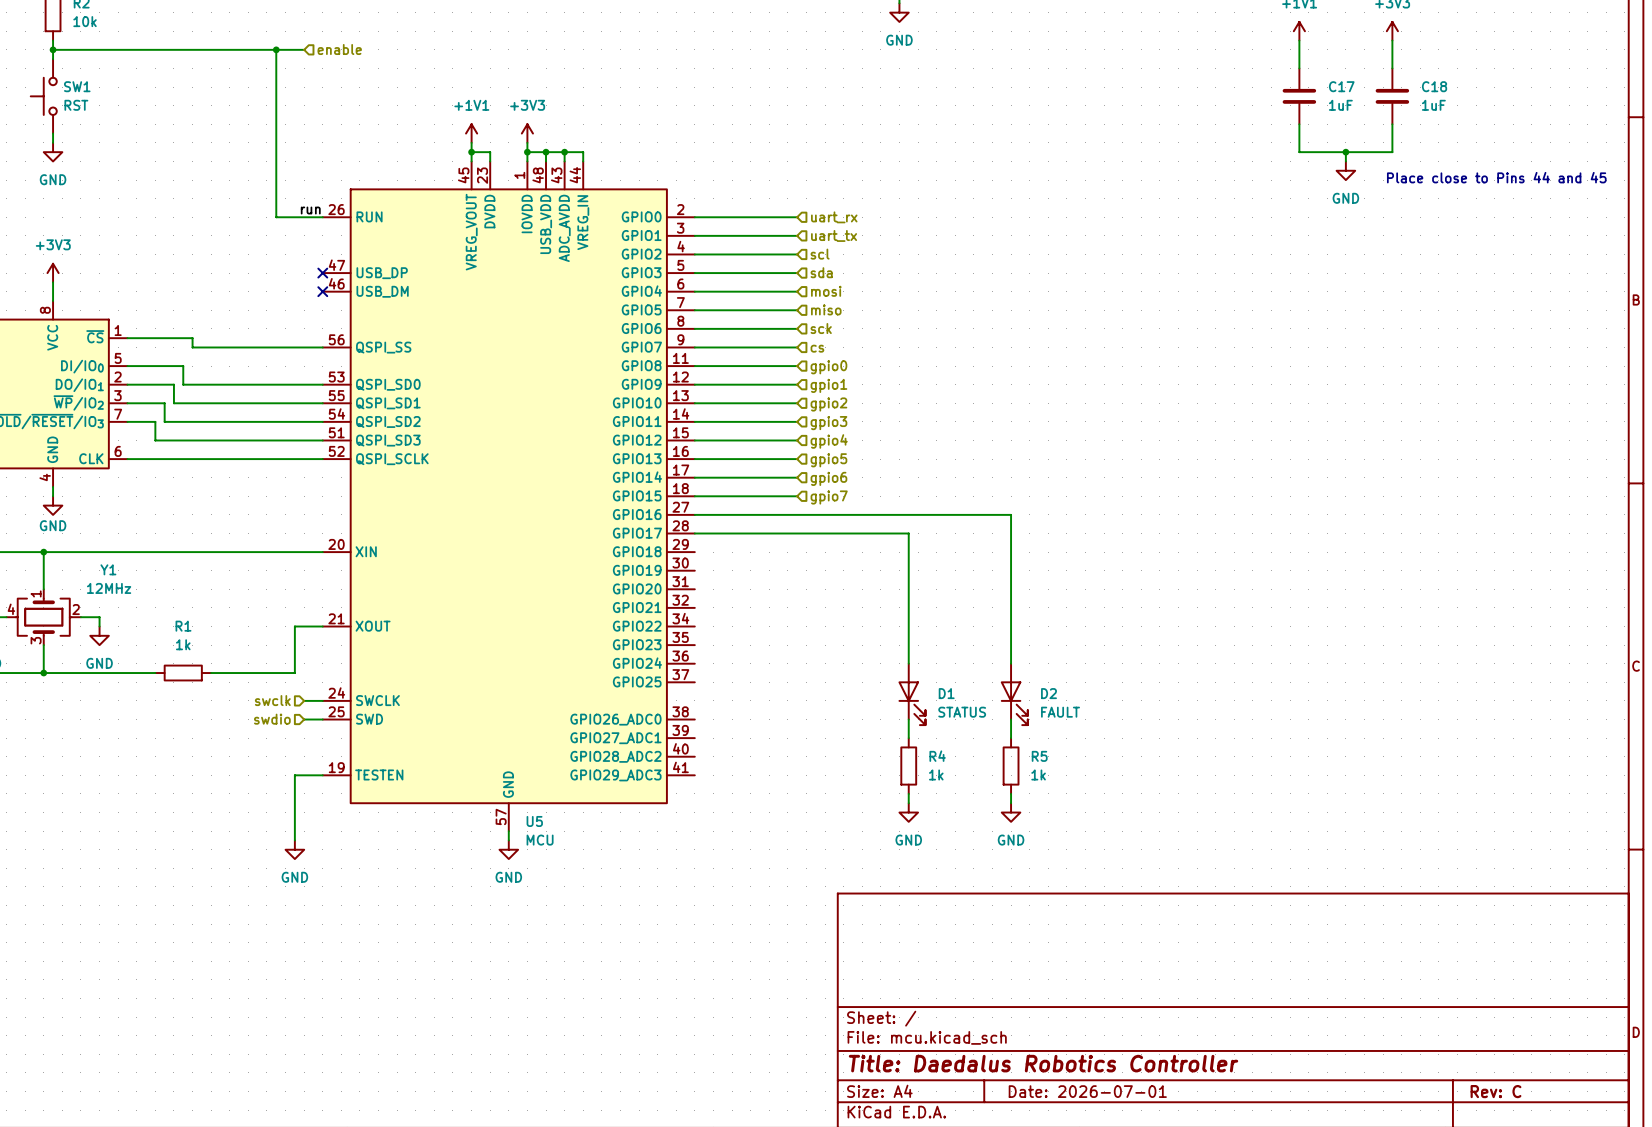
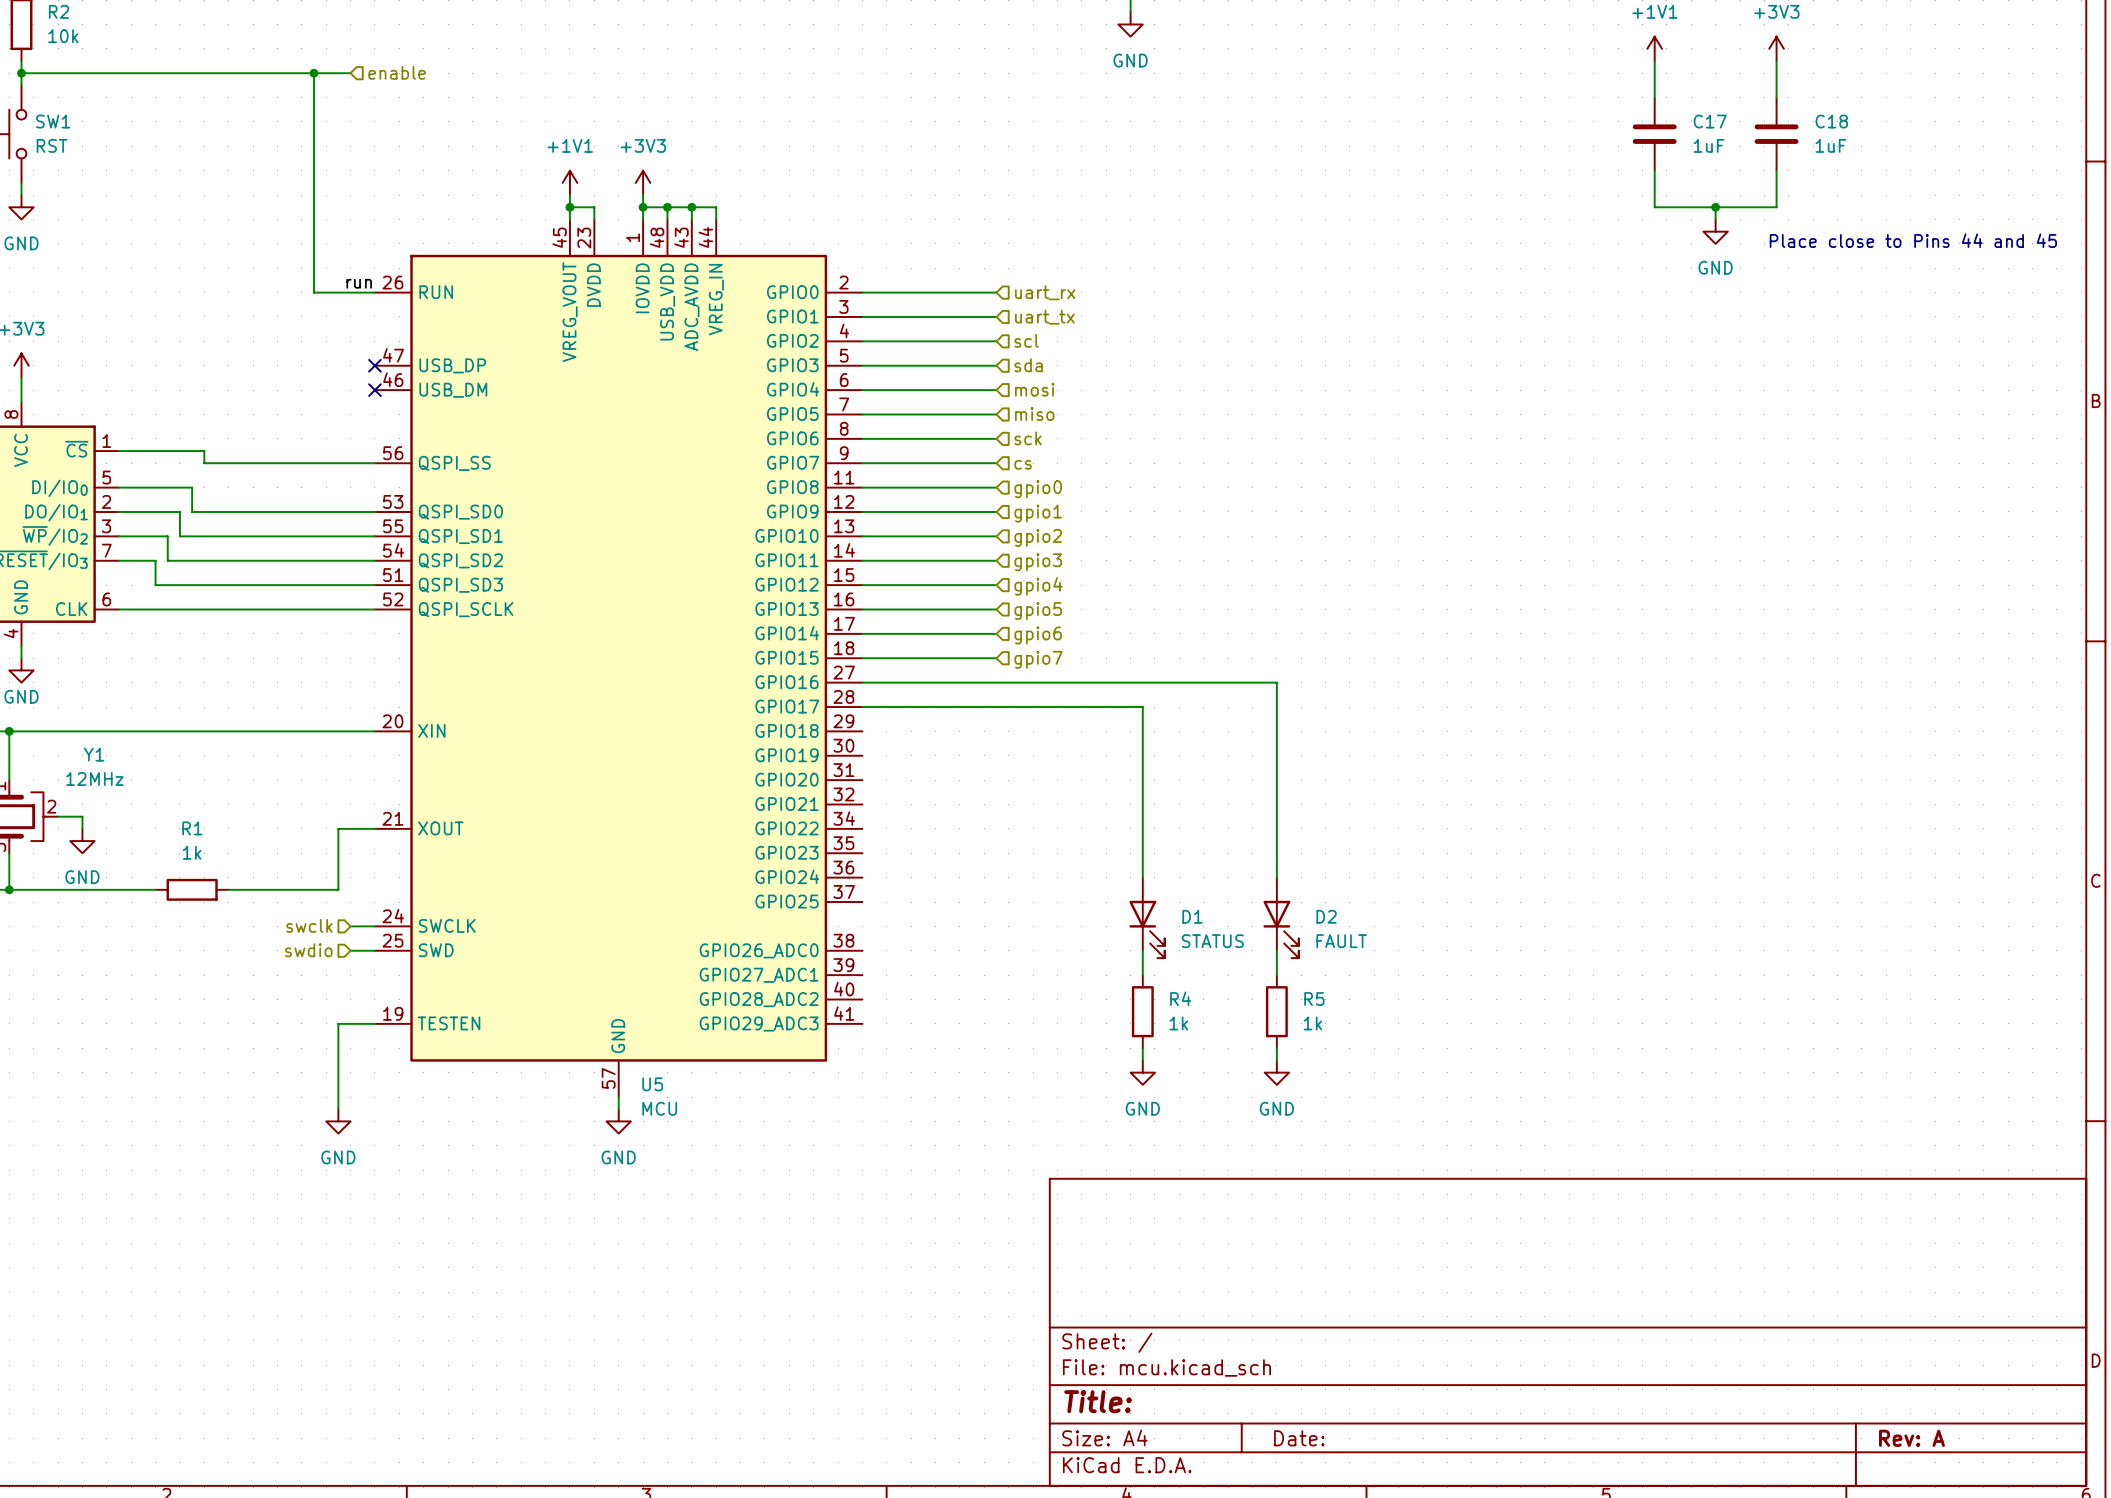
title block: Title: Daedalus Robotics Controller (1043, 1063) -> Title: (1098, 1401)
title block: Date: 2026-07-01 (1087, 1091) -> Date: (1299, 1438)
title block: Rev: C (1495, 1091) -> Rev: A (1911, 1438)

